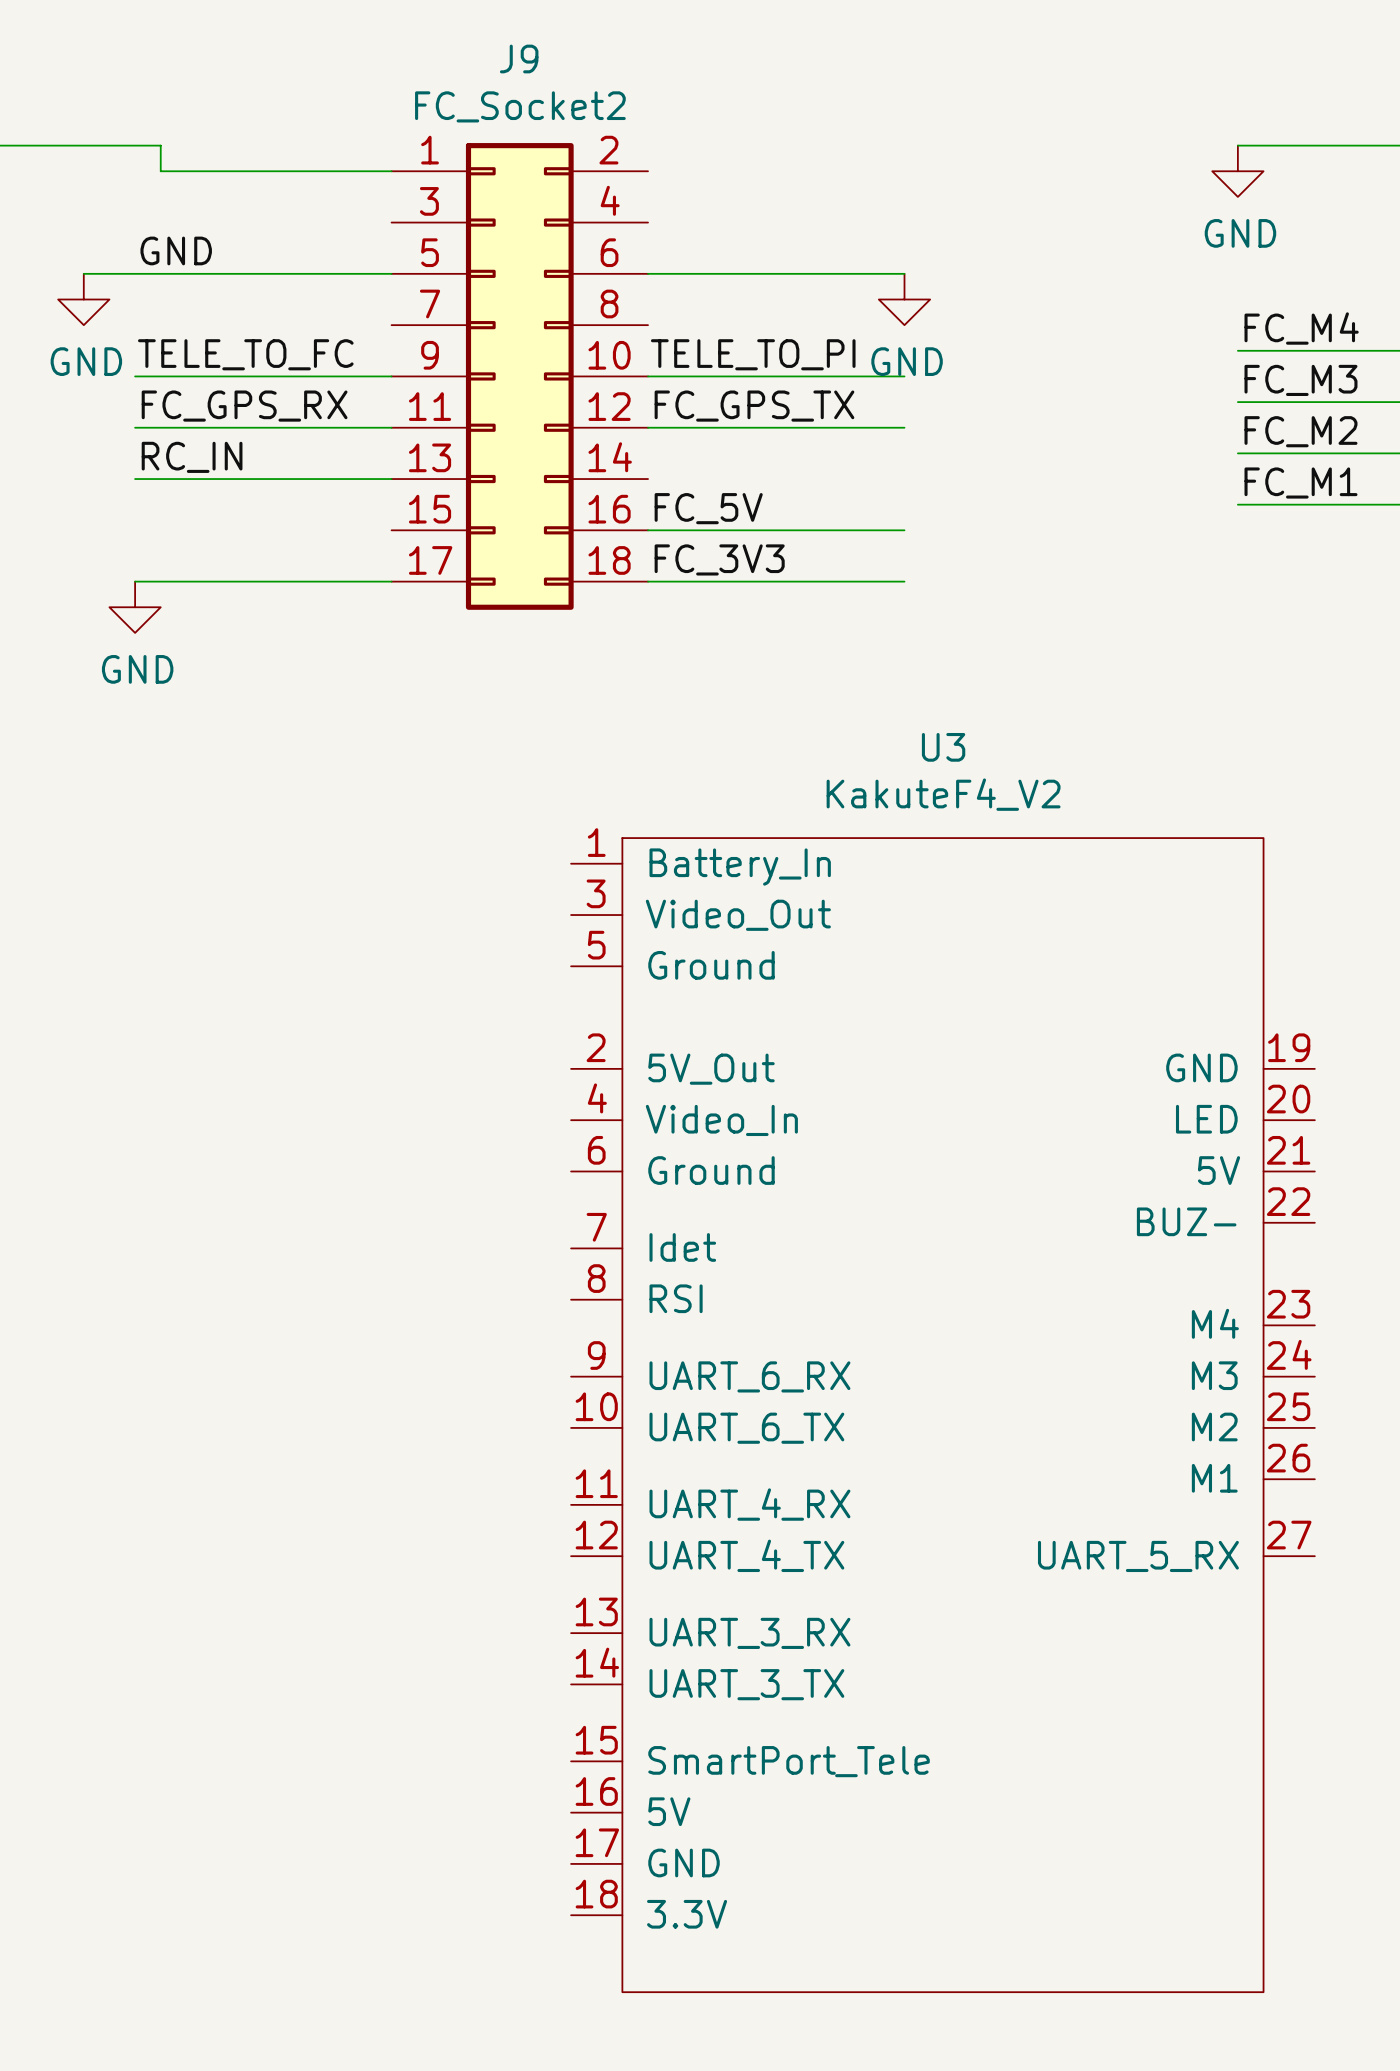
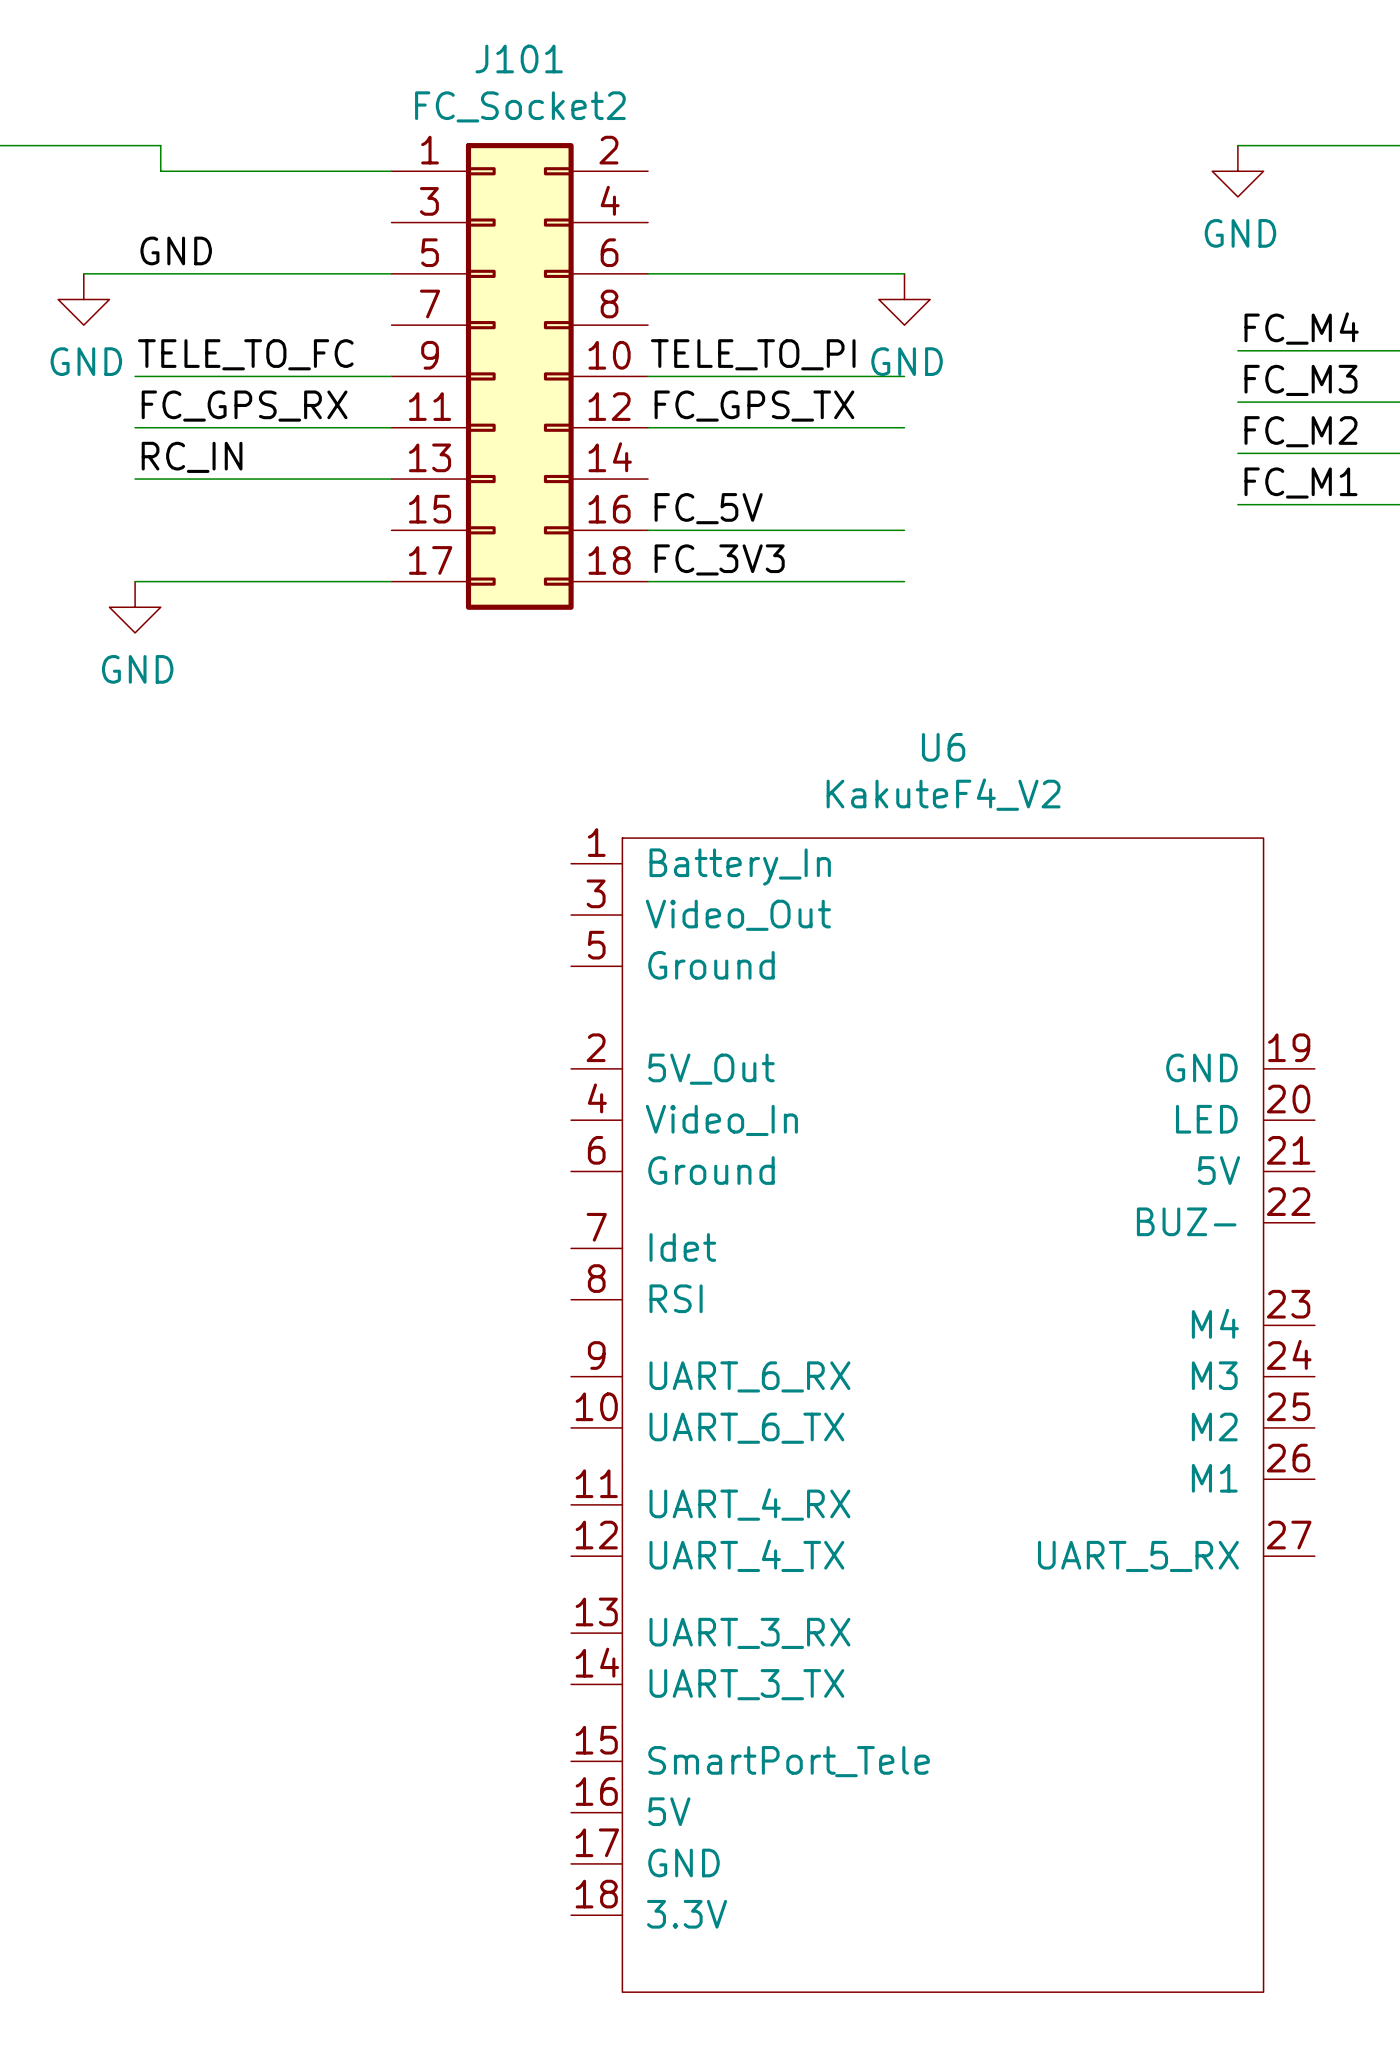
J9 name: J9 (519, 59) -> J101 (519, 59)
U3 name: U3 (943, 747) -> U6 (943, 747)

